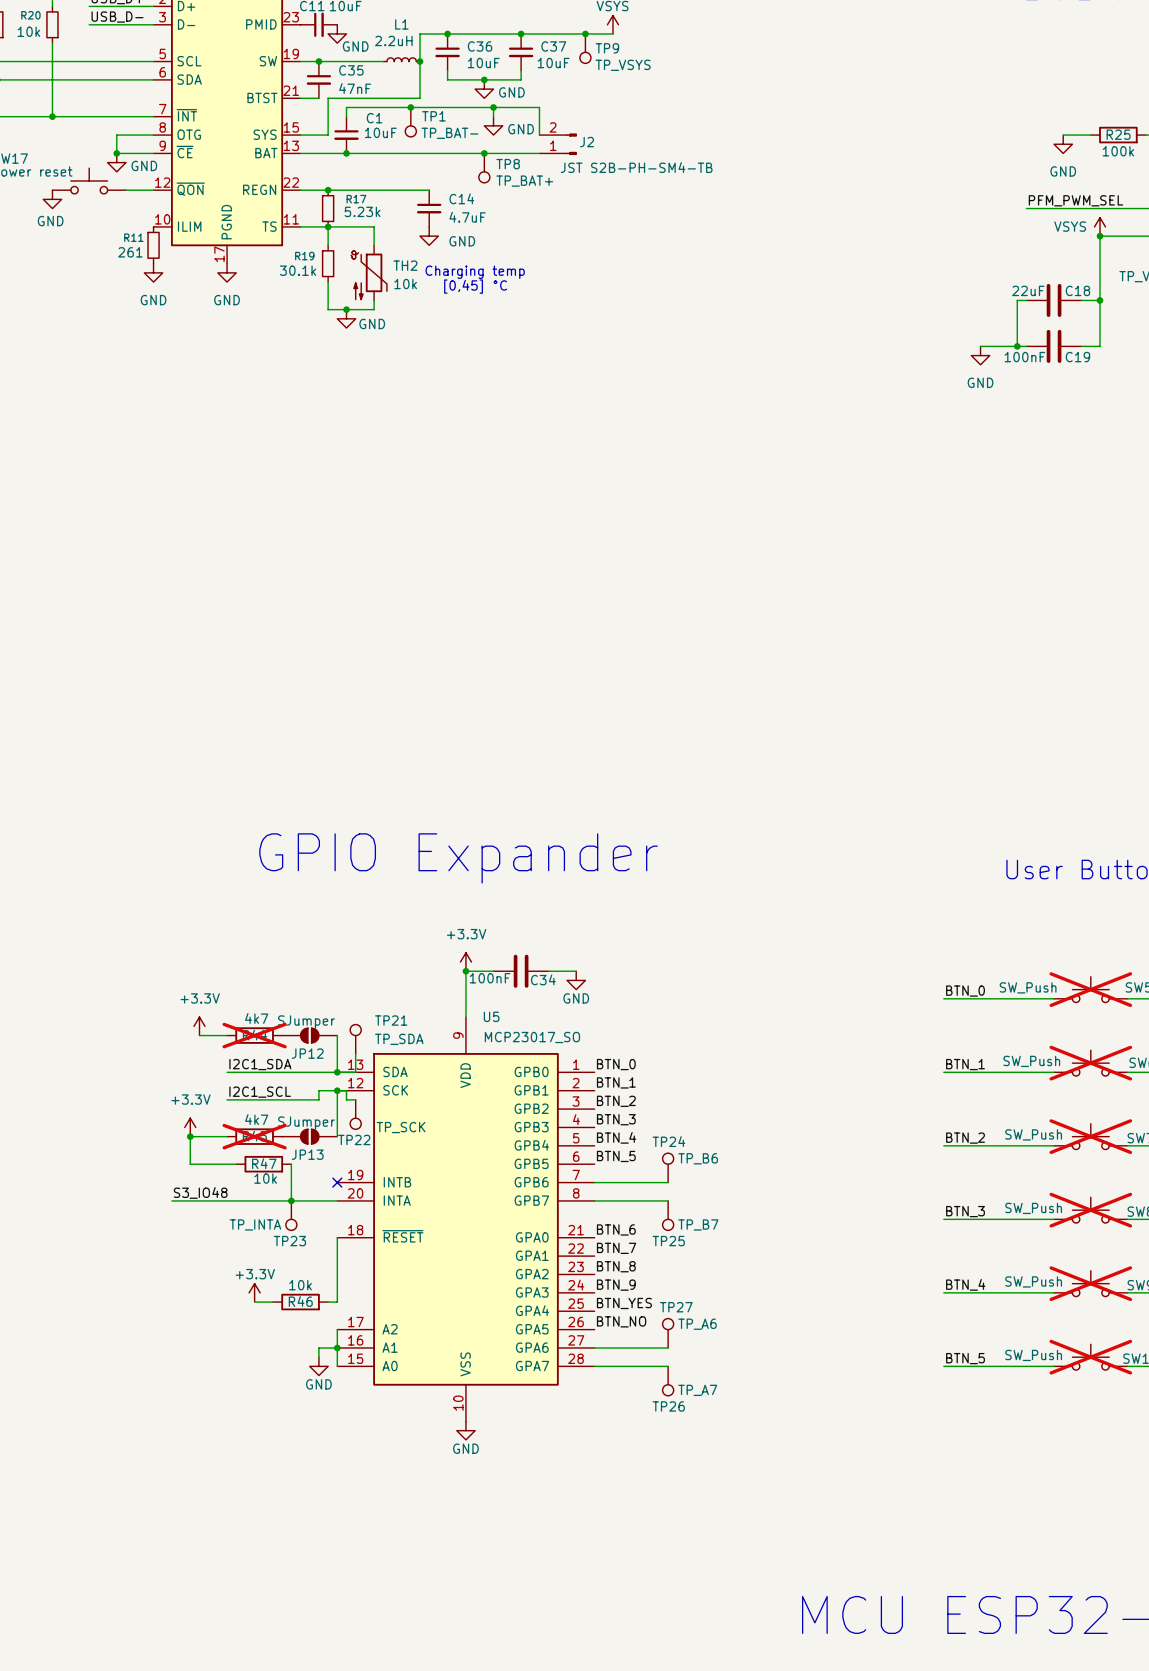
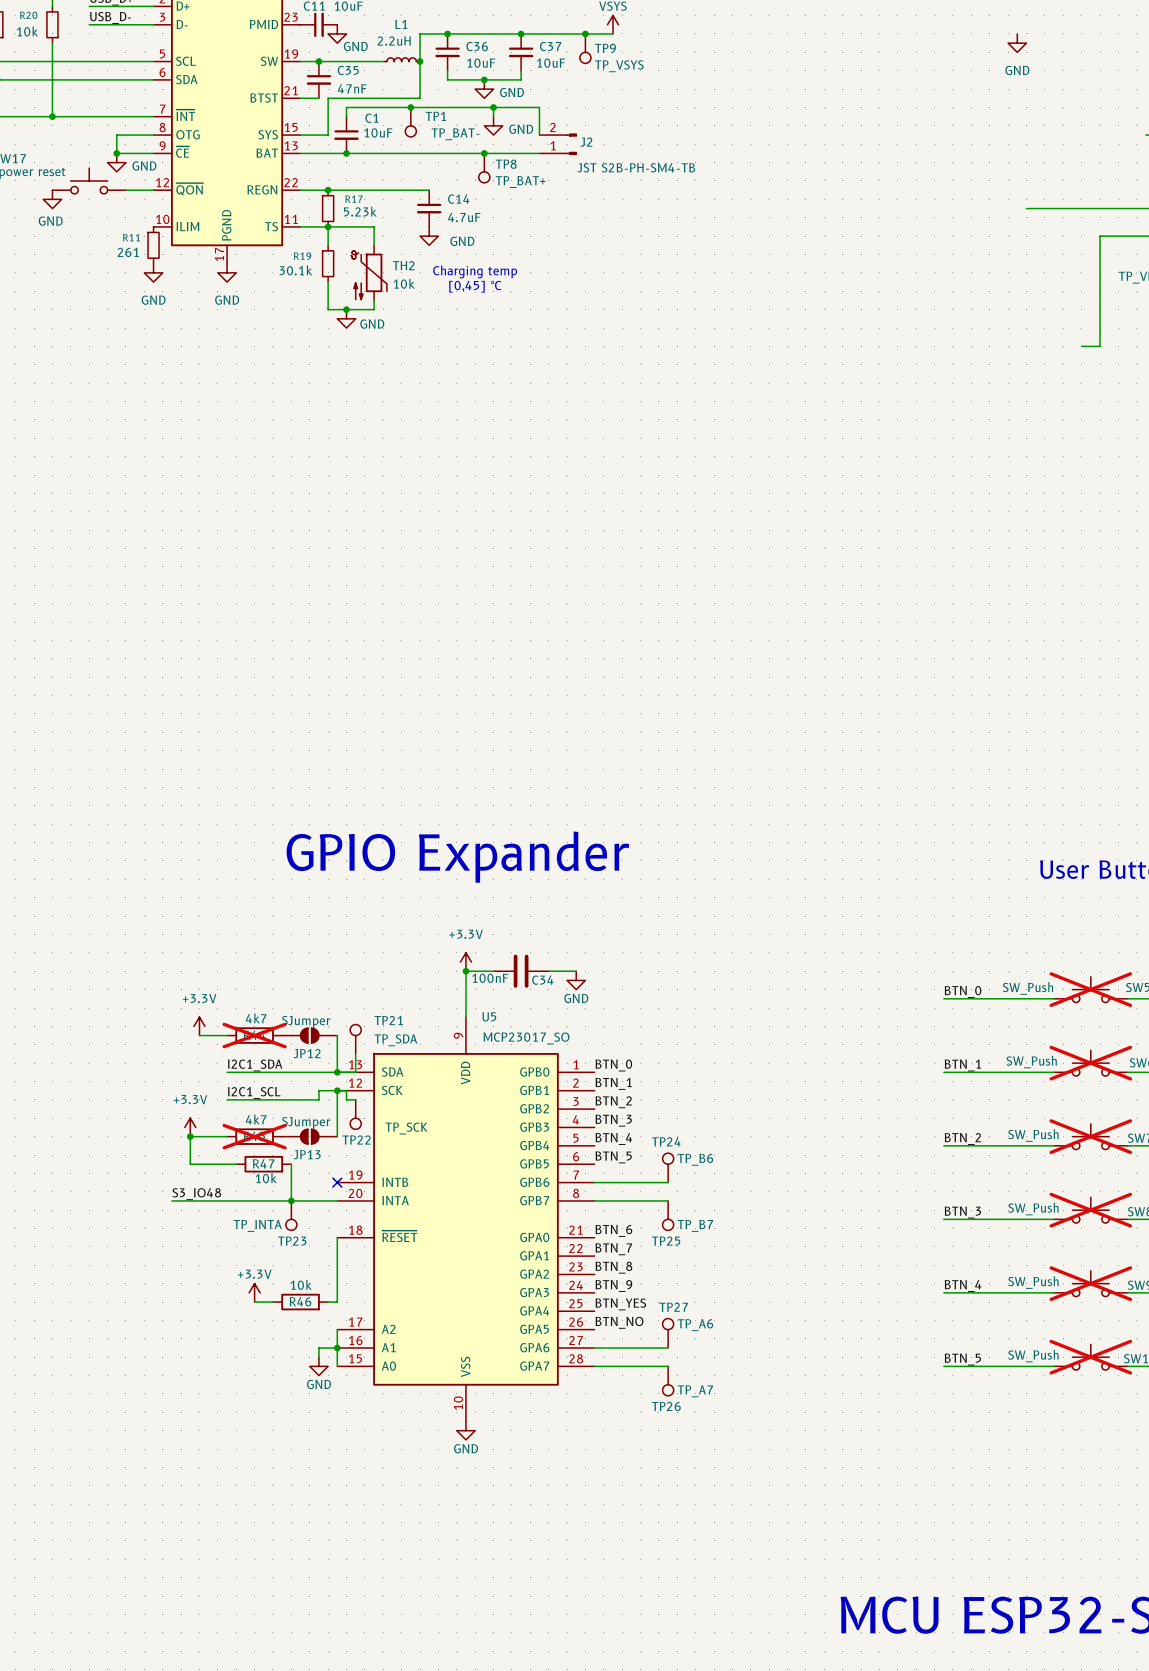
power symbol: none -> GND (1017, 43)
wire: (1063, 135) (1090, 135) -> none
R25: 100k (1118, 135) -> none
power symbol: GND (1063, 144) -> none
label: PFM_PWM_SEL (1076, 200) -> none
power symbol: VSYS (1100, 226) -> none
junction: (1100, 236) -> none
wire: (1026, 300) (1017, 300) (1017, 346) -> none
C18: 22uF (1054, 300) -> none
wire: (1081, 300) (1100, 300) -> none
junction: (1100, 300) -> none
wire: (980, 346) (1026, 346) -> none
junction: (1017, 346) -> none
C19: 100nF (1054, 346) -> none
power symbol: GND (980, 355) -> none

